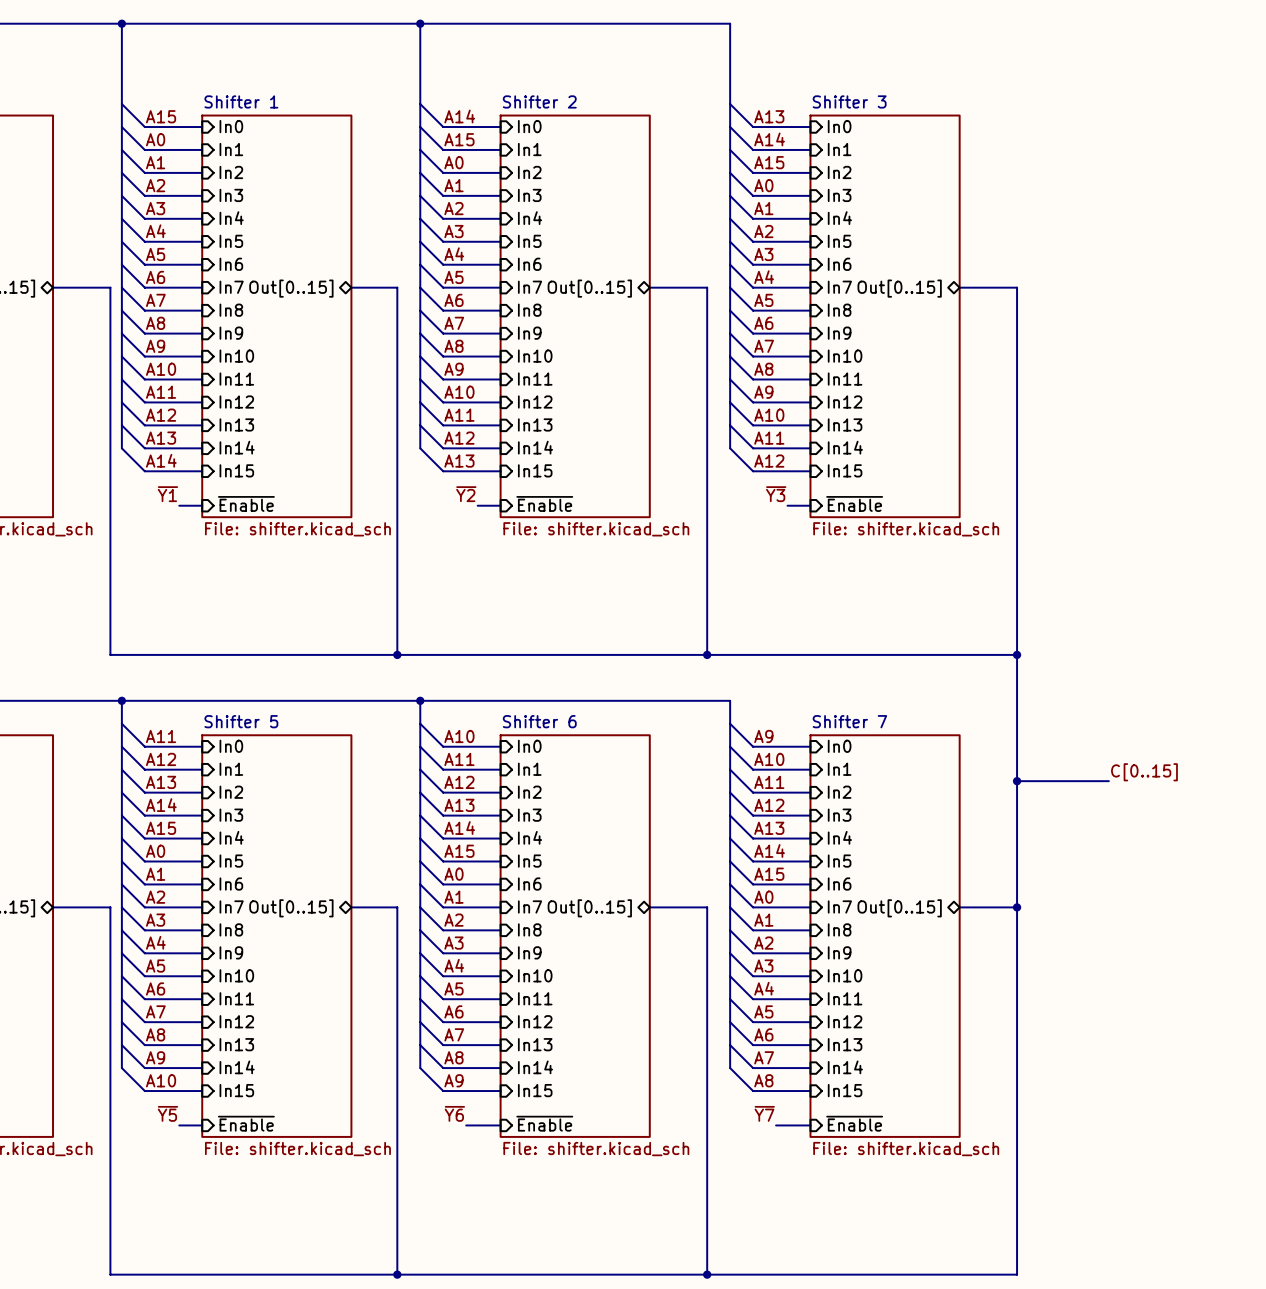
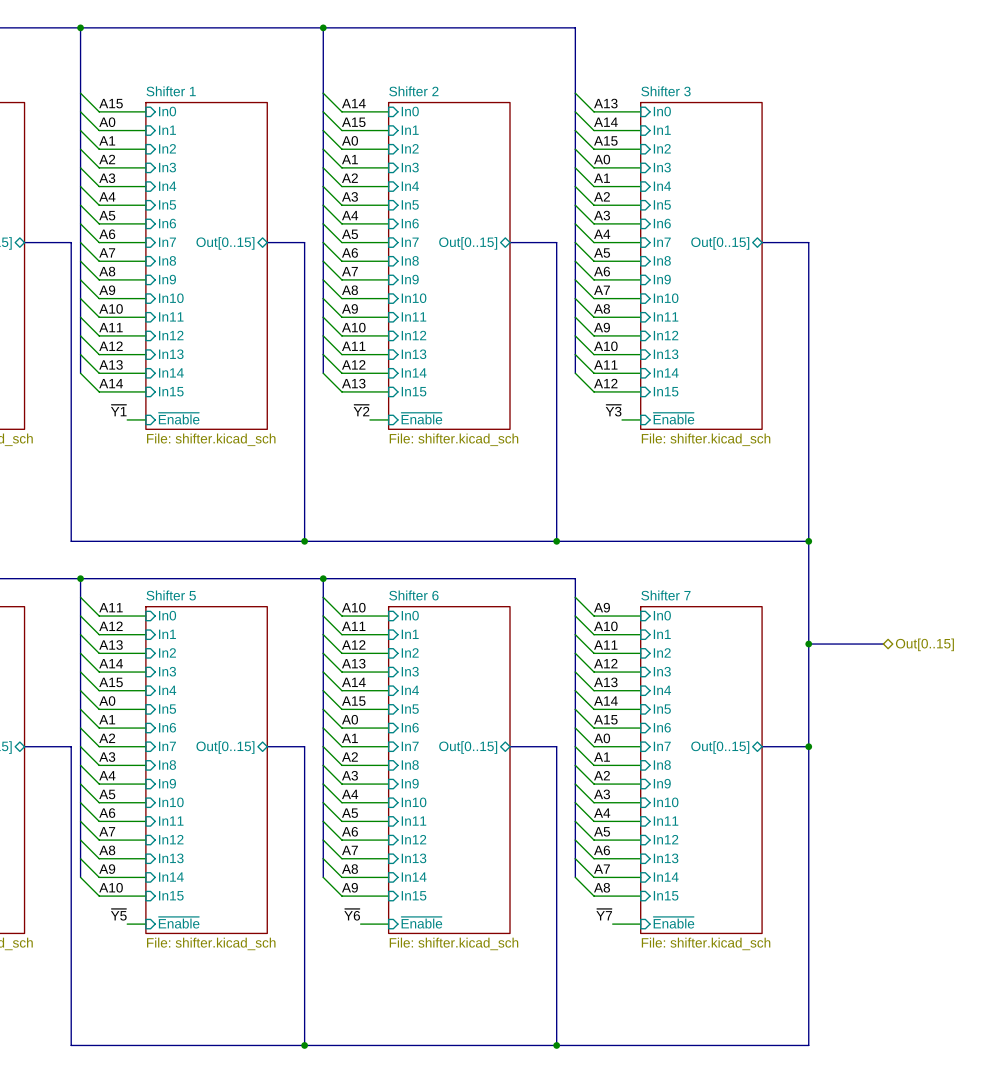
label: C[0..15] (1144, 772) -> none
hierarchical label: none -> Out[0..15] (924, 644)

